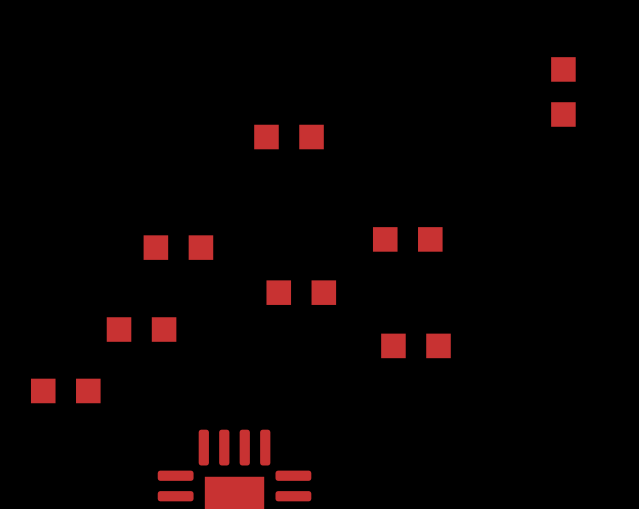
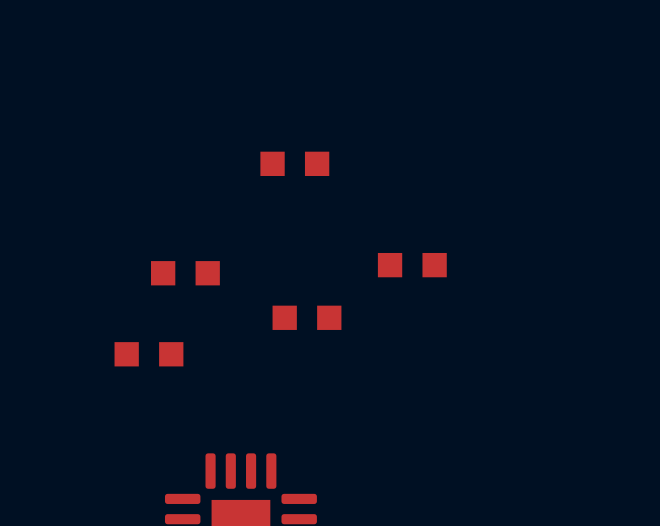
part: (563, 91) -> none
part: (415, 345) -> none
part: (65, 390) -> none

